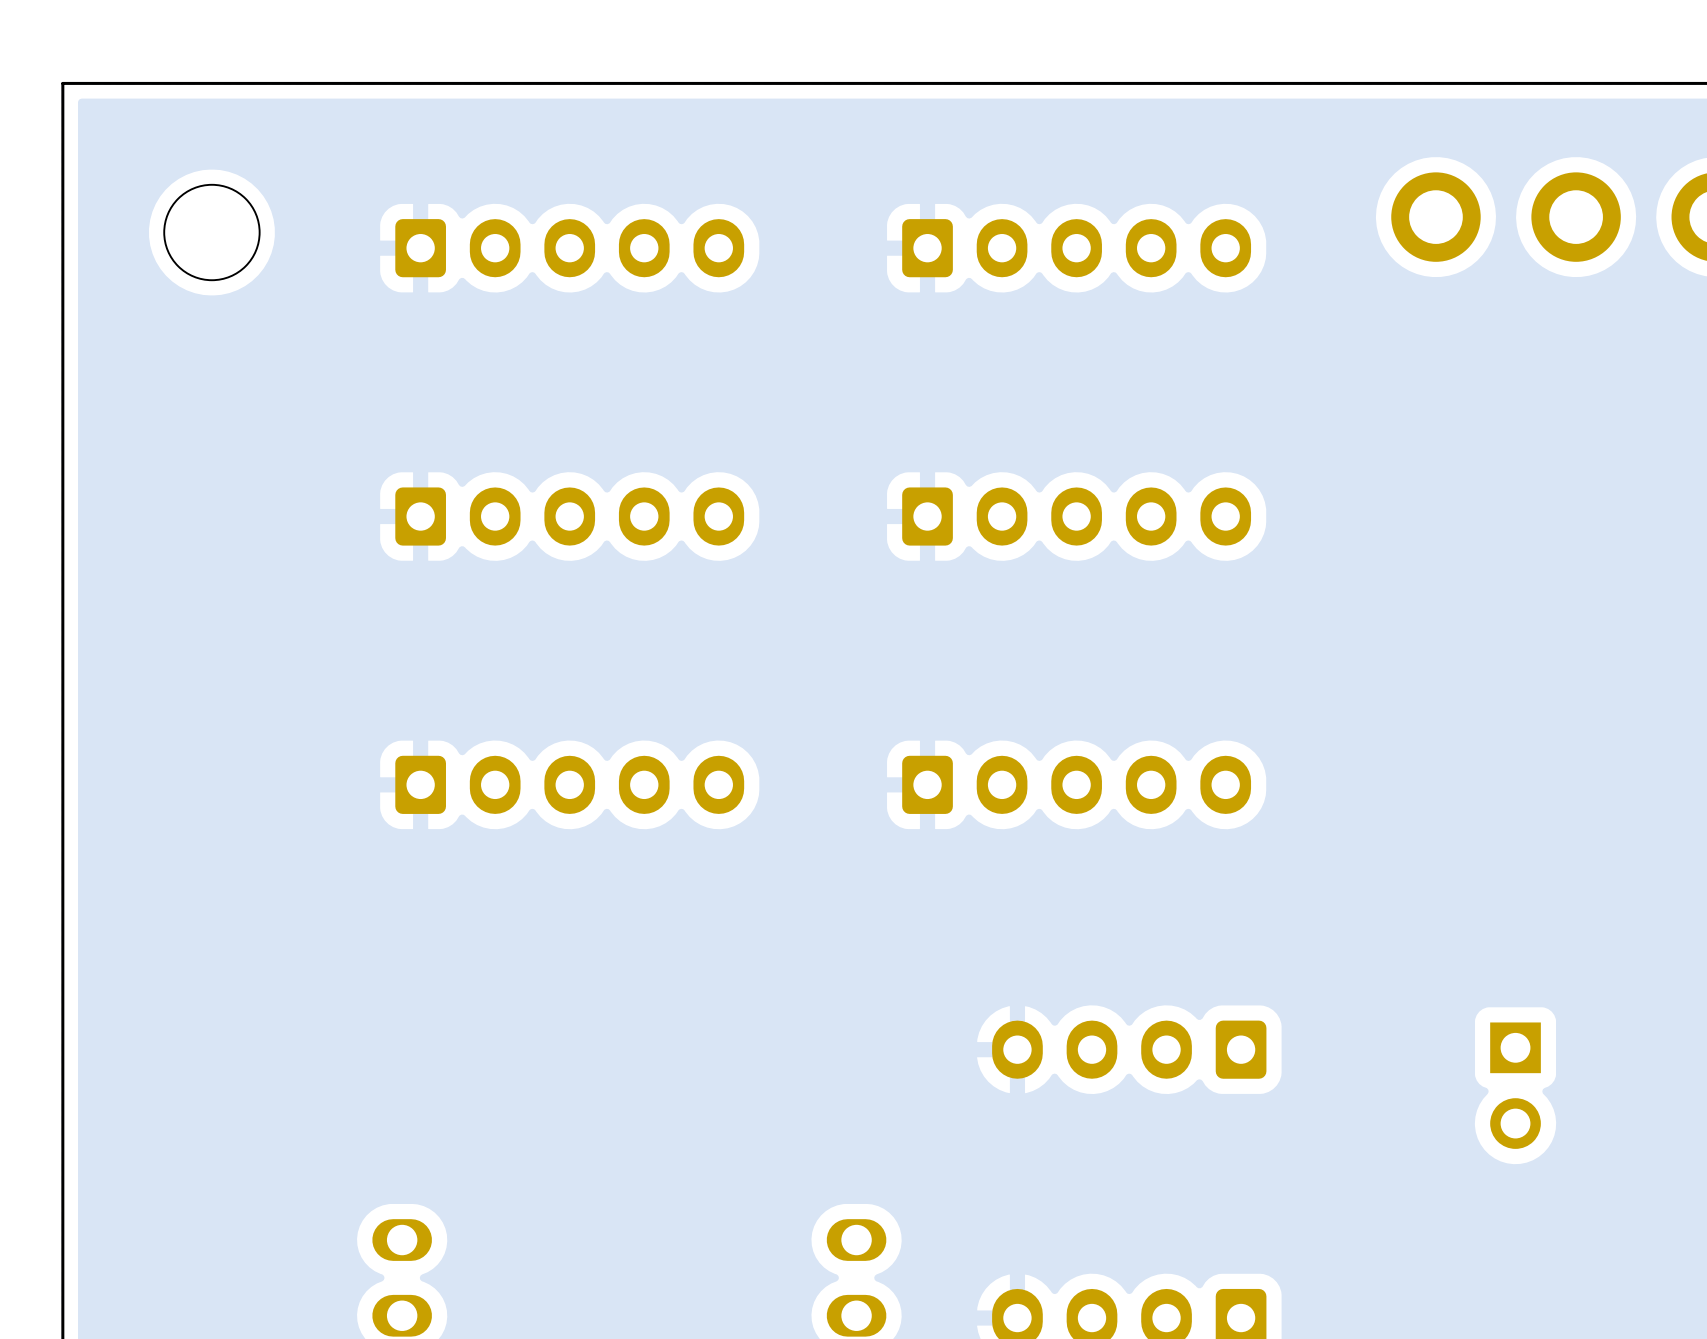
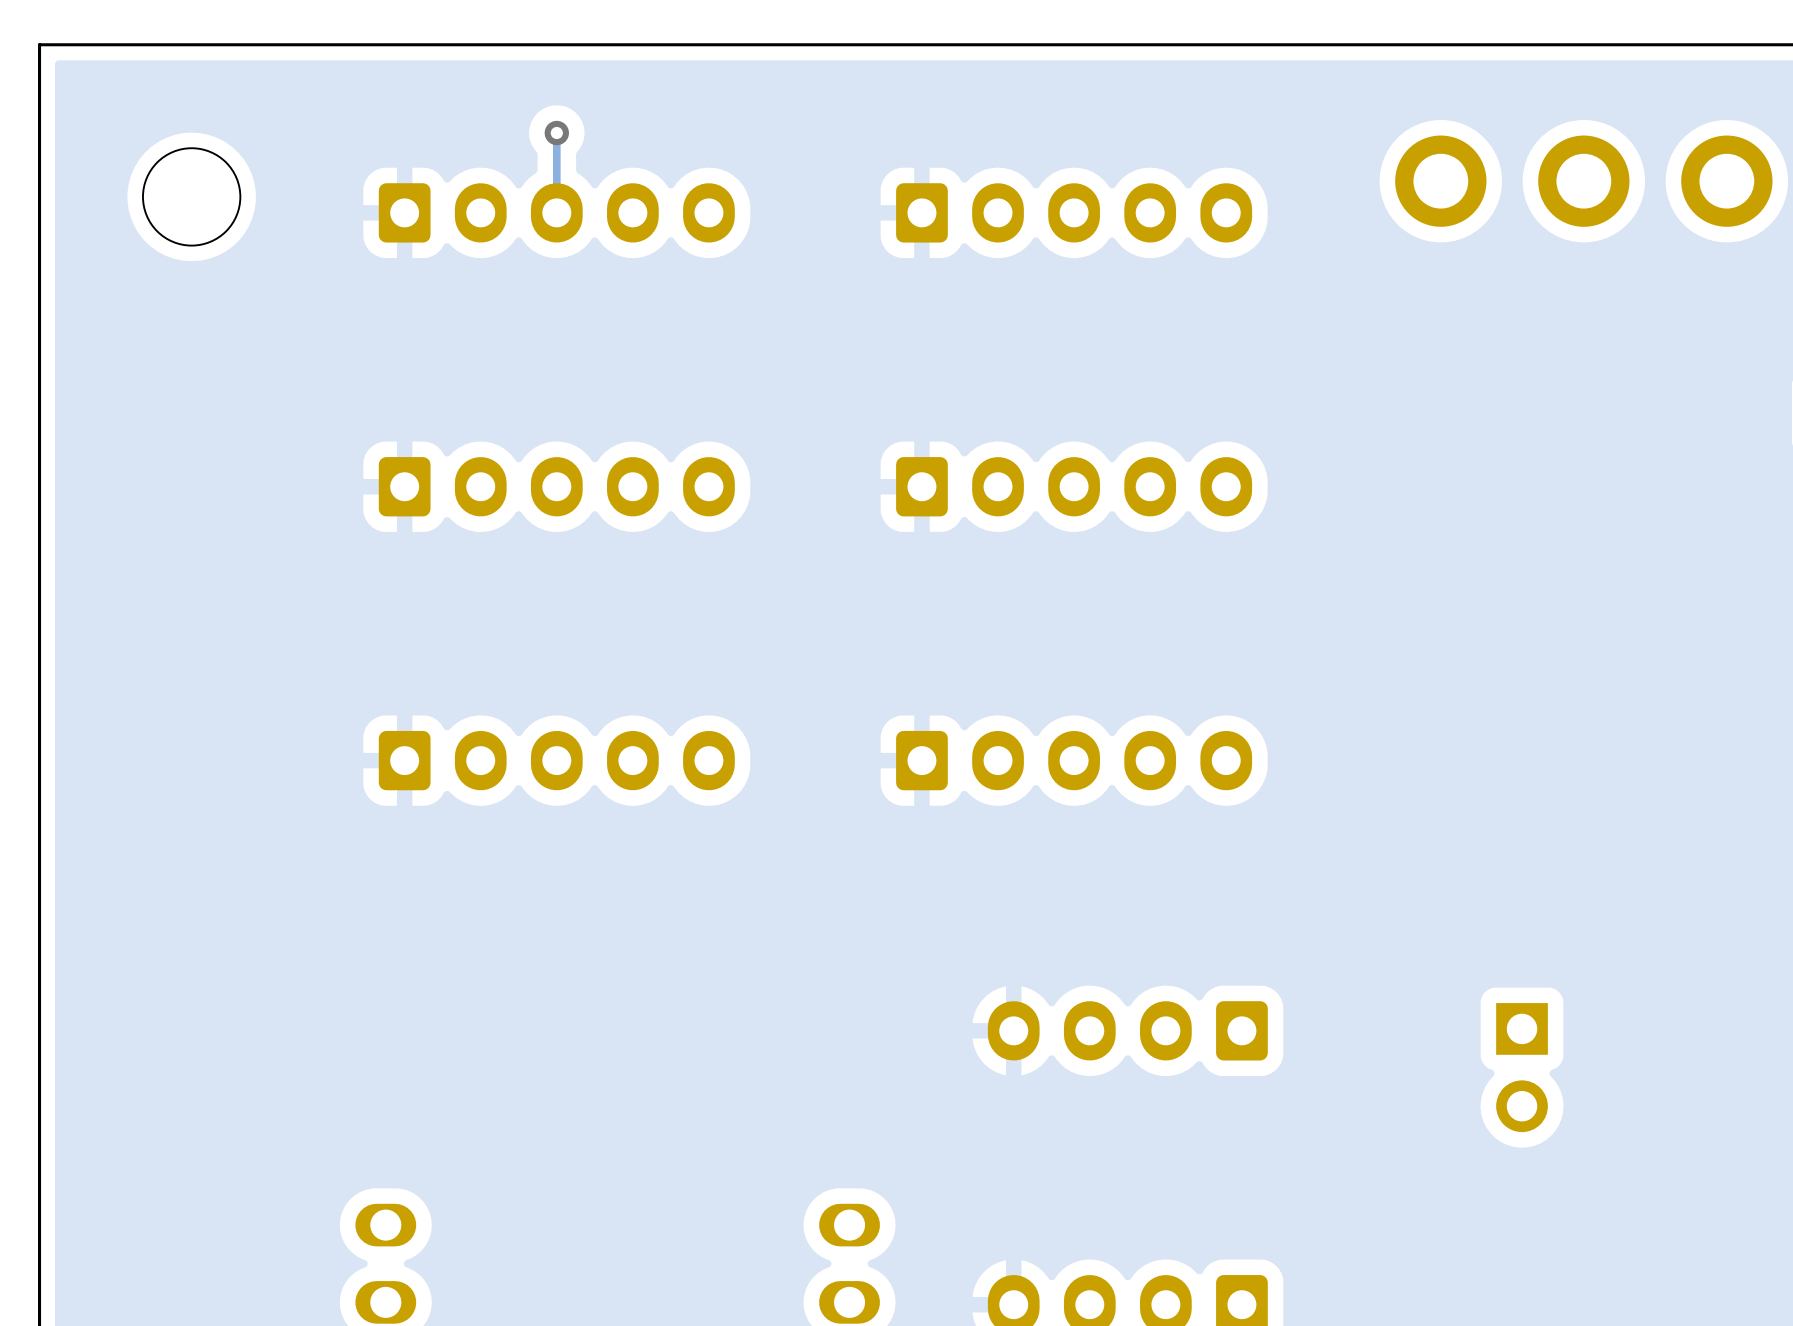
track: none -> (556, 133) (556, 212)
via: none -> (556, 133)

